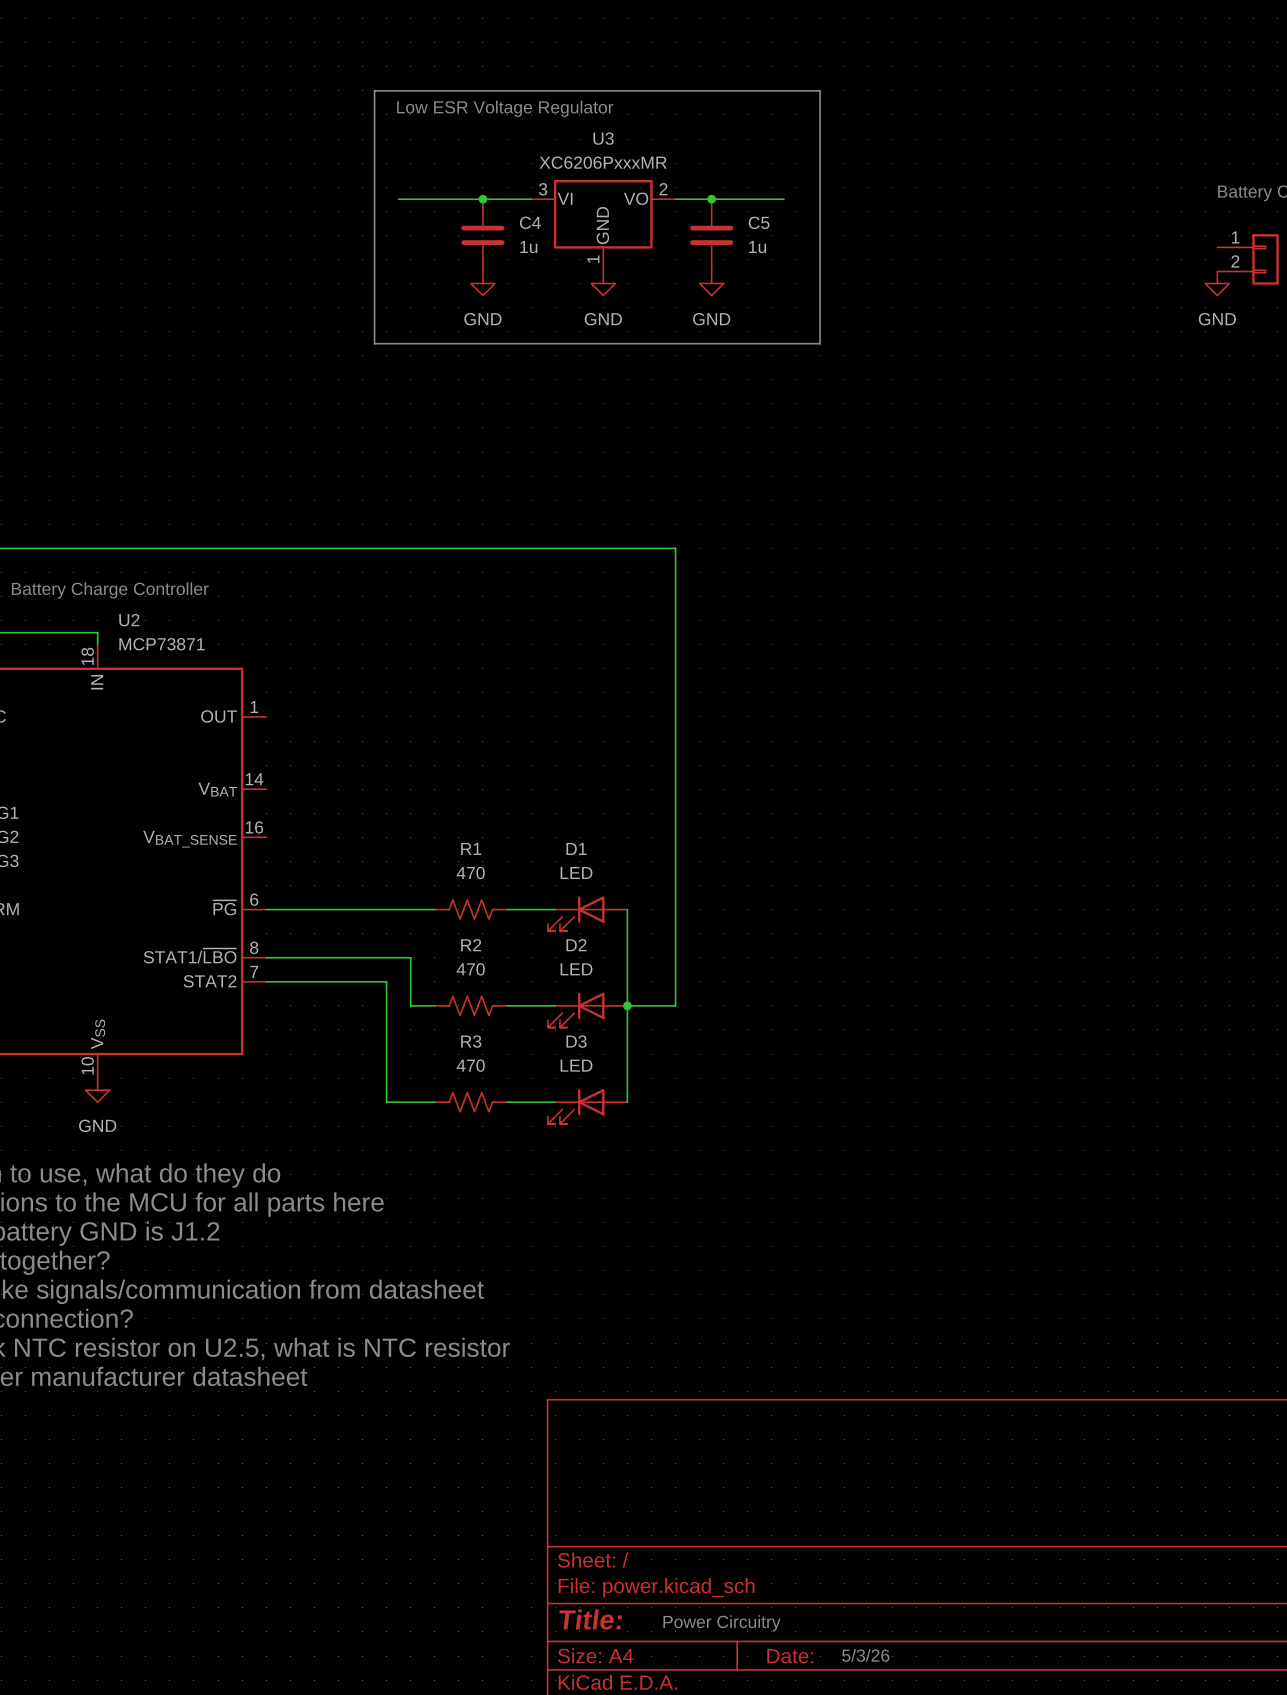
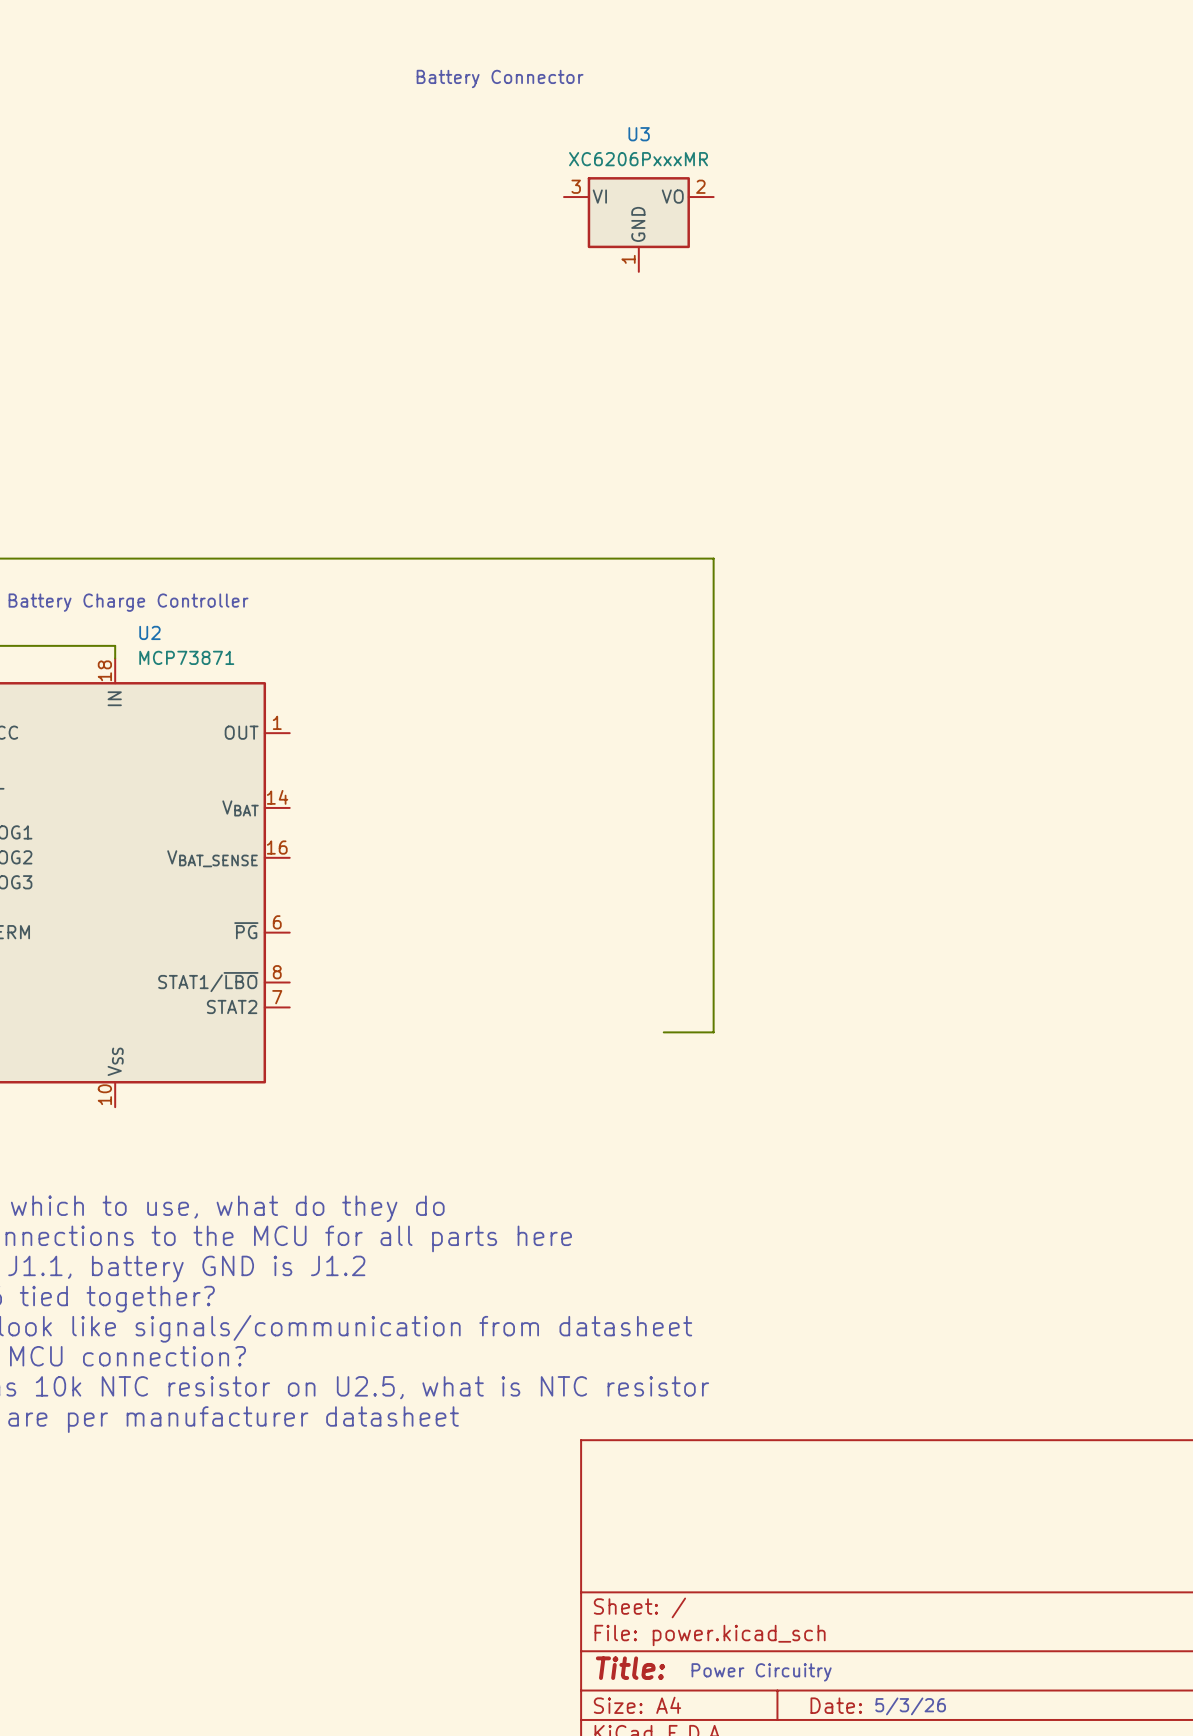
text: none -> Battery Connector (500, 78)
line: (374, 90) (820, 90) (820, 343) (374, 343) (374, 90) -> none
text: Low ESR Voltage Regulator (505, 108) -> none
wire: (398, 199) (531, 199) -> none
junction: (482, 199) -> none
wire: (675, 199) (783, 199) -> none
junction: (711, 199) -> none
C4: 1u (482, 235) -> none
C5: 1u (711, 235) -> none
power symbol: GND (482, 283) -> none
power symbol: GND (603, 283) -> none
power symbol: GND (711, 283) -> none
wire: (266, 909) (434, 909) -> none
R1: 470 (470, 909) -> none
wire: (507, 909) (555, 909) -> none
wire: (627, 909) (627, 1102) -> none
D1: LED (587, 913) -> none
wire: (266, 957) (410, 957) (410, 1005) (434, 1005) -> none
wire: (266, 981) (386, 981) (386, 1102) (434, 1102) -> none
R2: 470 (470, 1005) -> none
wire: (507, 1005) (555, 1005) -> none
junction: (627, 1005) -> none
D2: LED (587, 1010) -> none
power symbol: GND (97, 1090) -> none
R3: 470 (470, 1102) -> none
wire: (507, 1102) (555, 1102) -> none
D3: LED (587, 1106) -> none

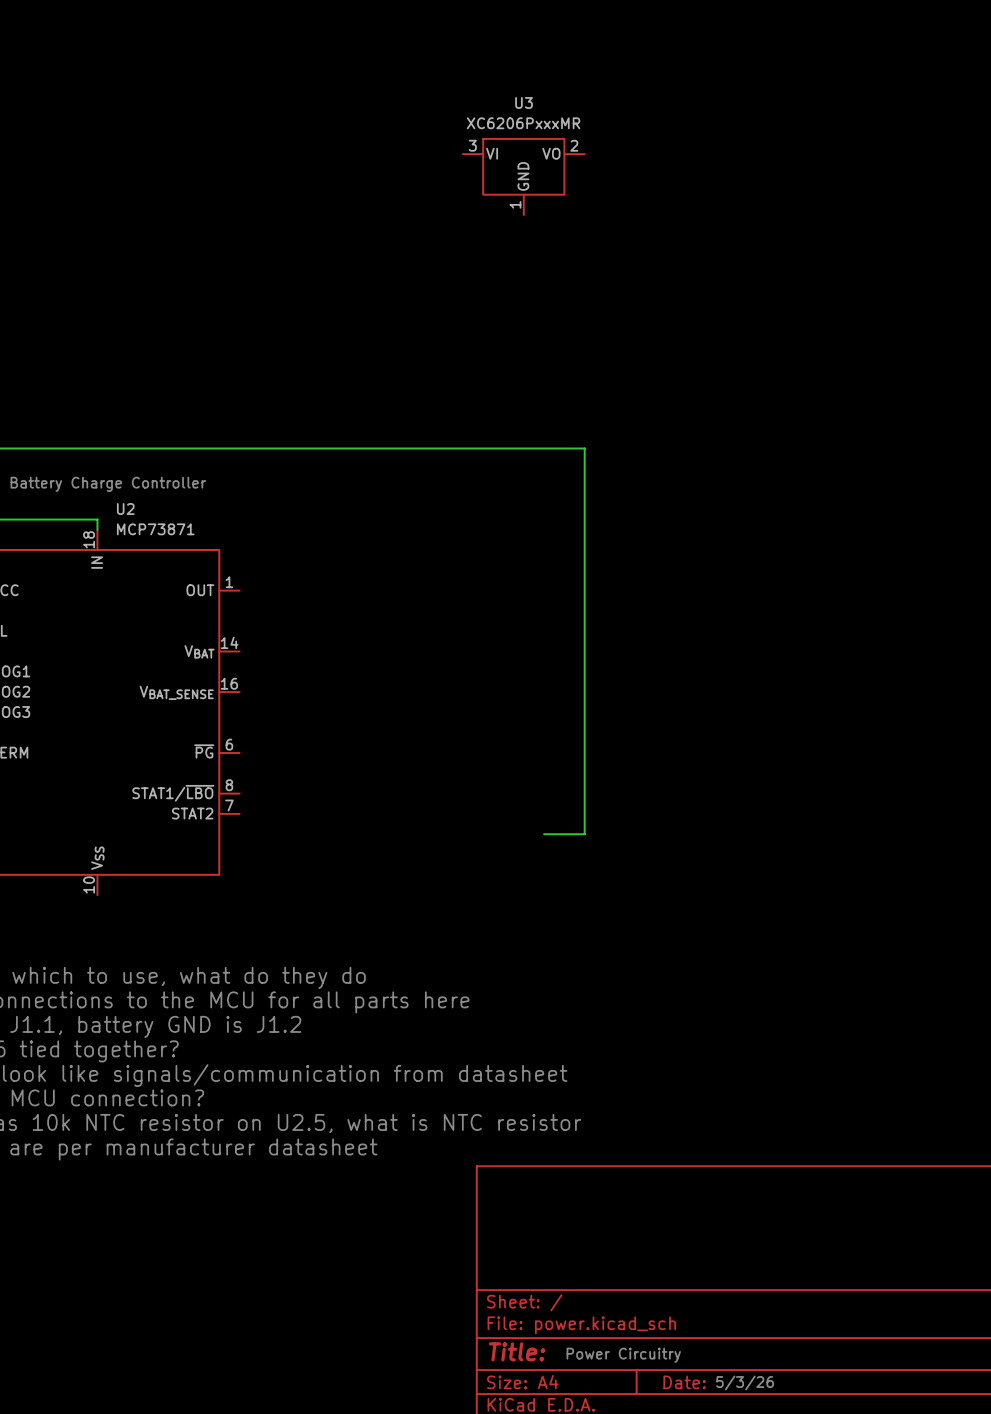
text: Battery Connector (500, 78) -> none

